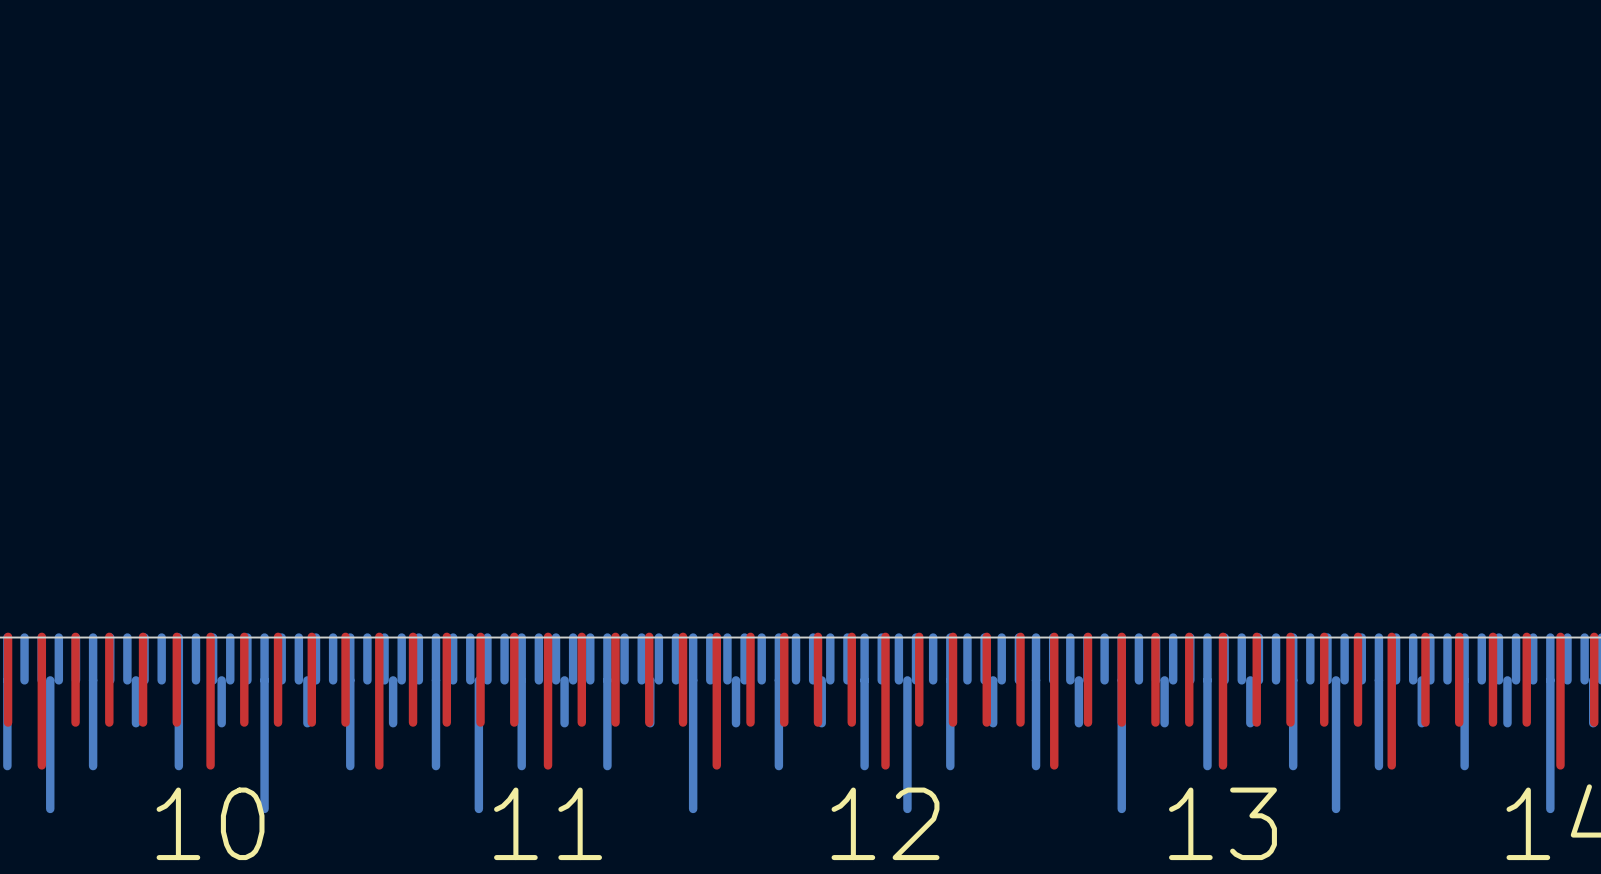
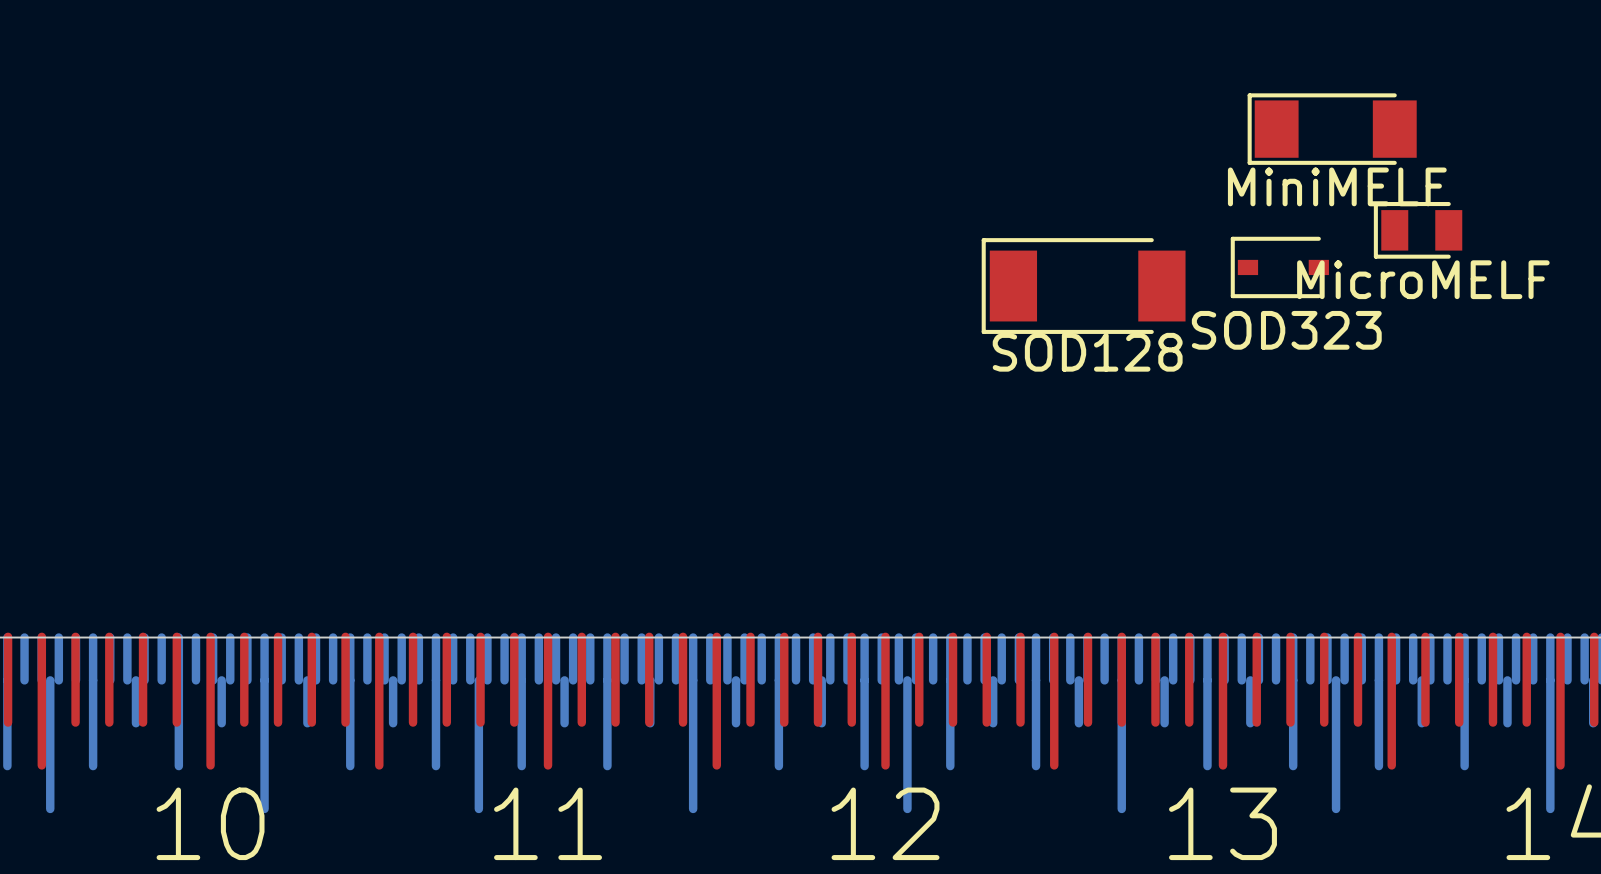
part: none -> MiniMELF (1332, 129)
part: none -> MicroMELF (1418, 230)
part: none -> SOD323 (1279, 267)
part: none -> SOD128 (1083, 286)

